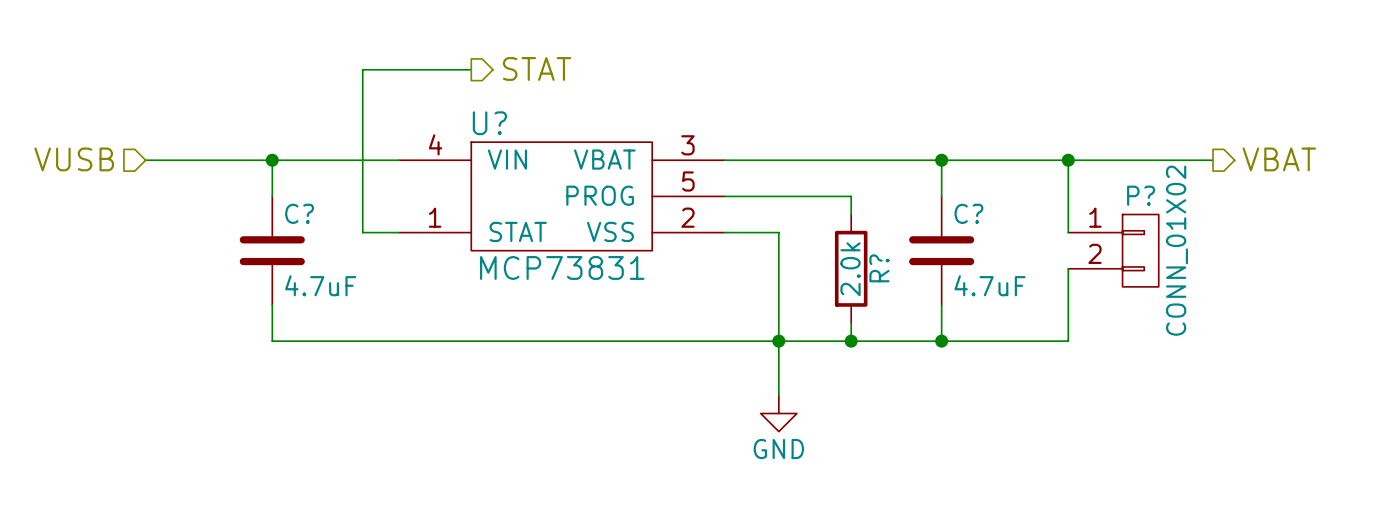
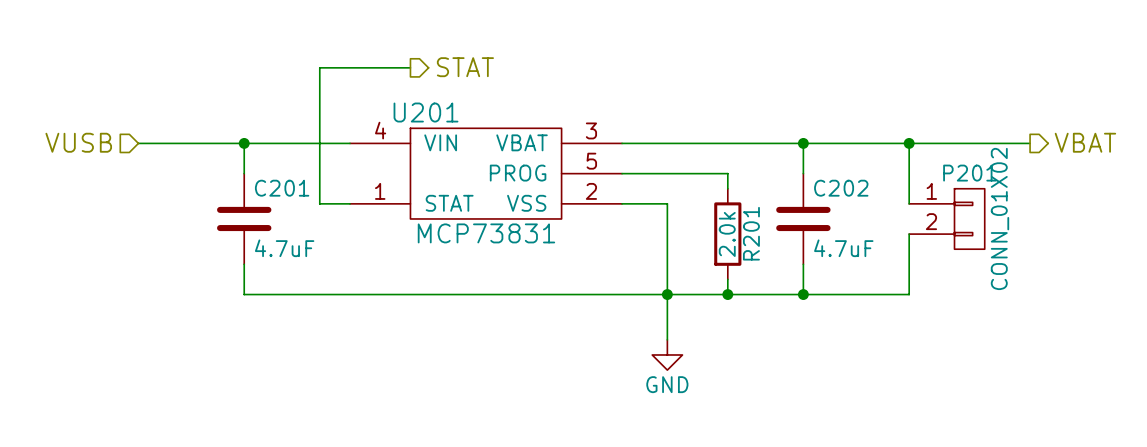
U? name: U? (489, 123) -> U201 (426, 112)
P? name: P? (1141, 195) -> P201 (969, 173)
C? name: C? (299, 213) -> C201 (282, 188)
C? name: C? (968, 213) -> C202 (841, 188)
R? name: R? (879, 268) -> R201 (751, 233)

